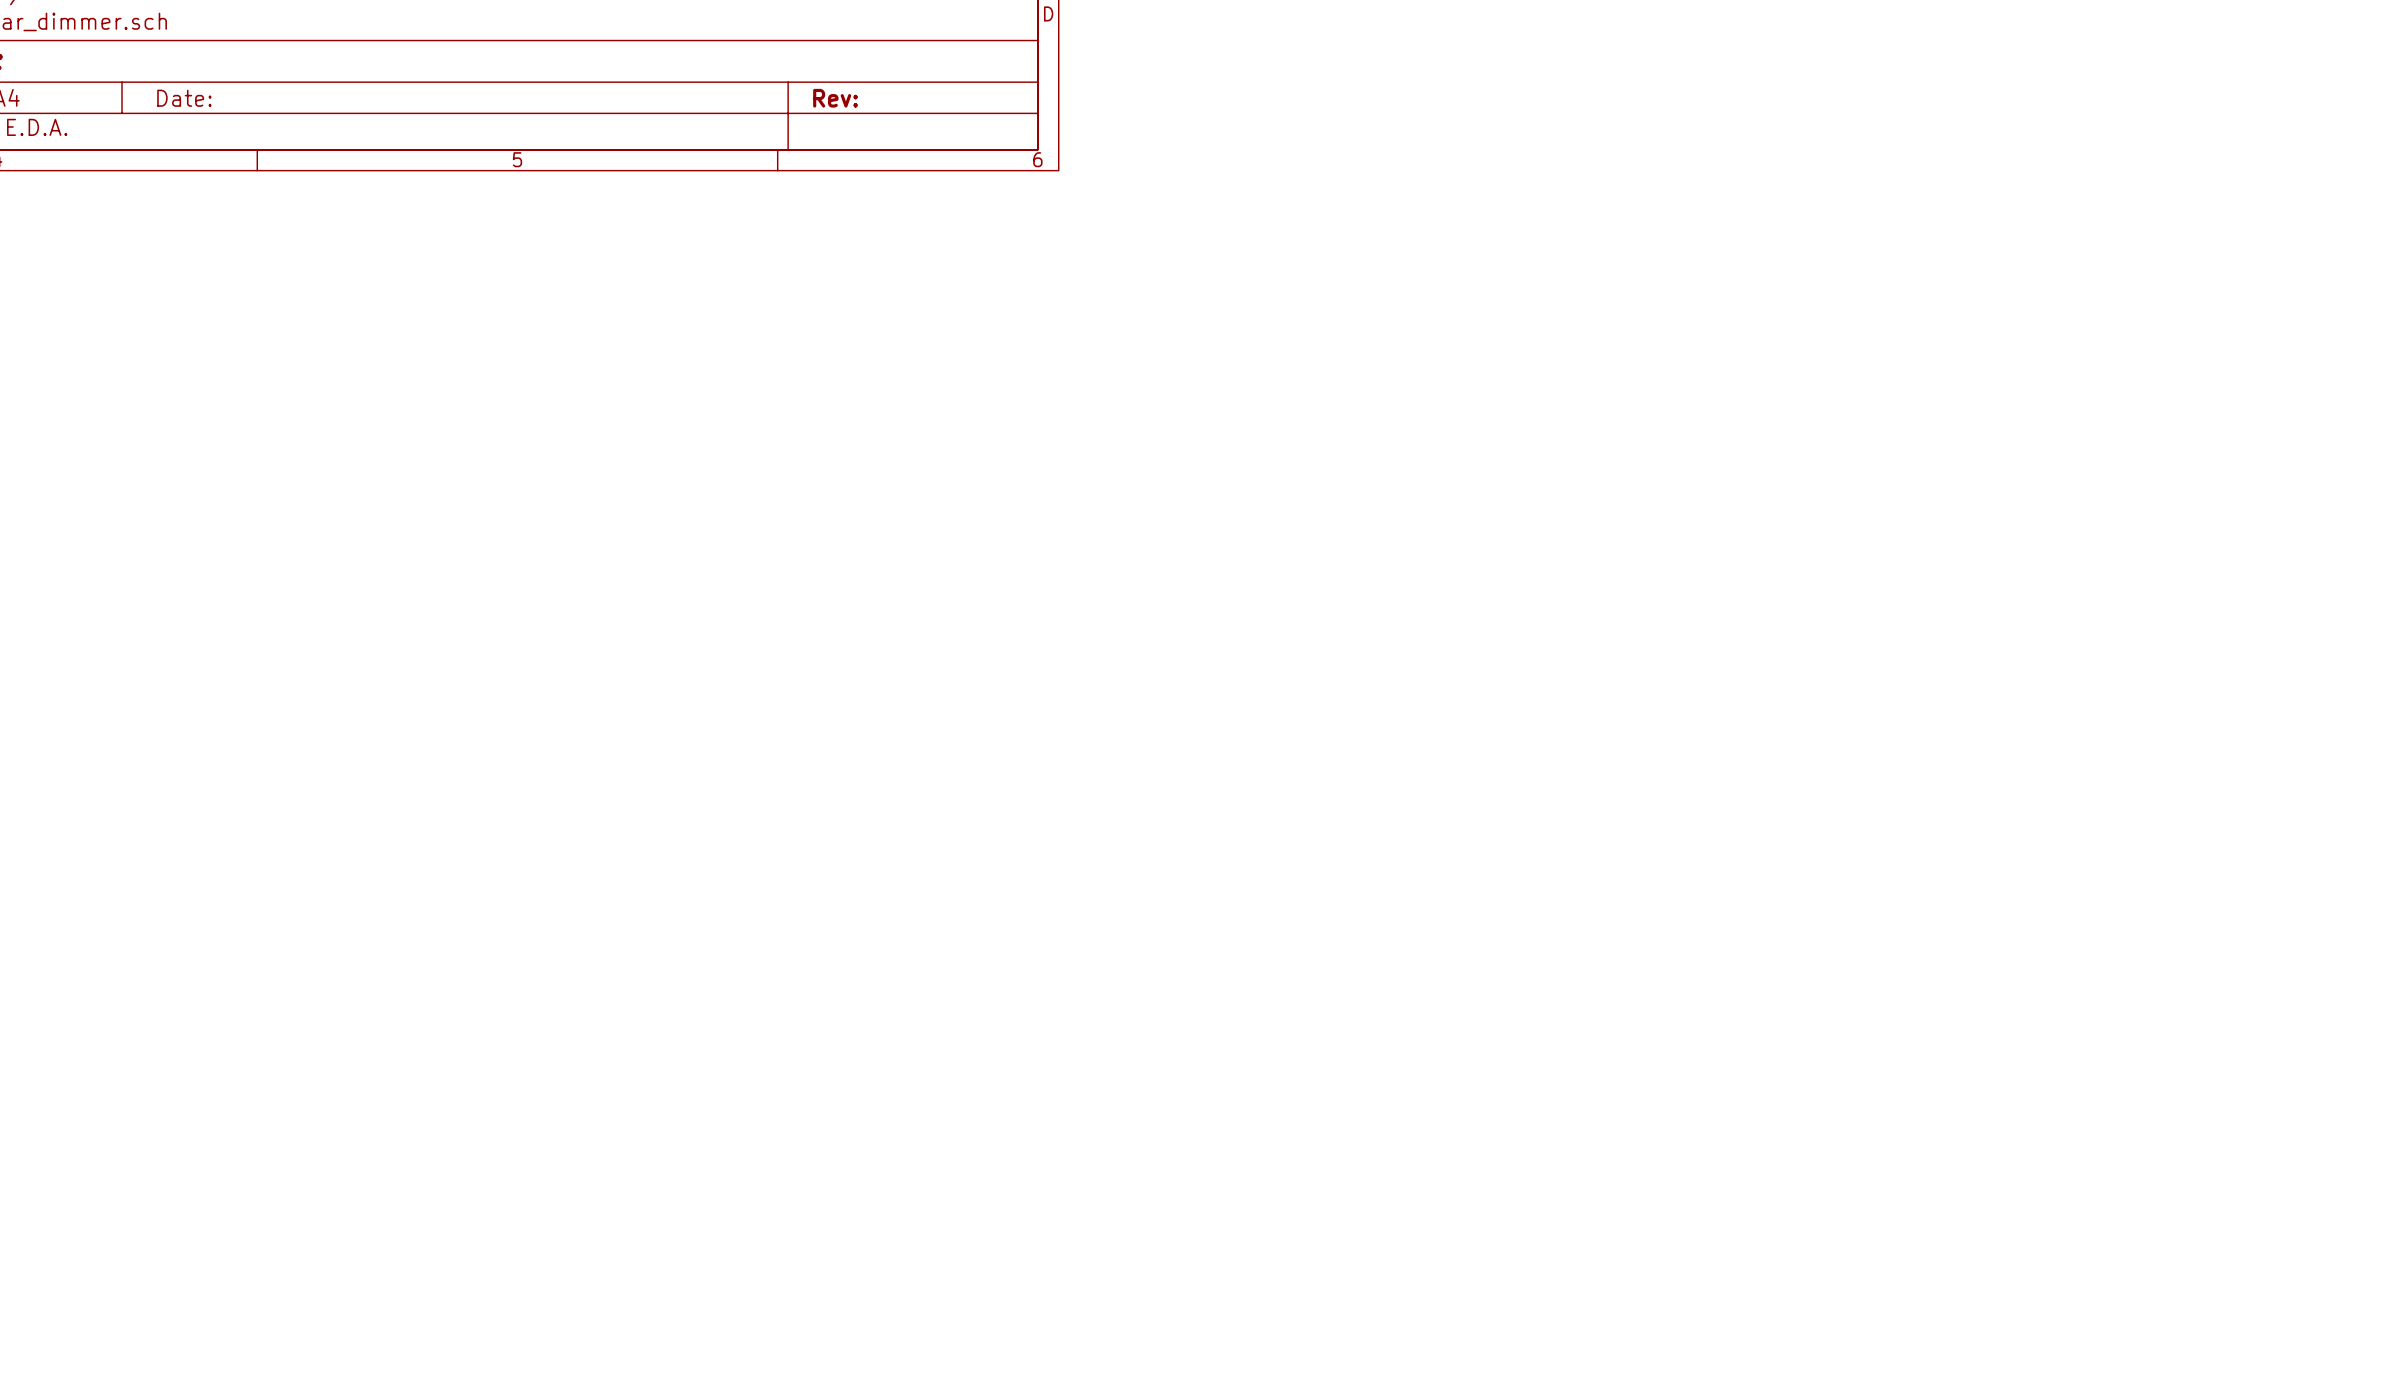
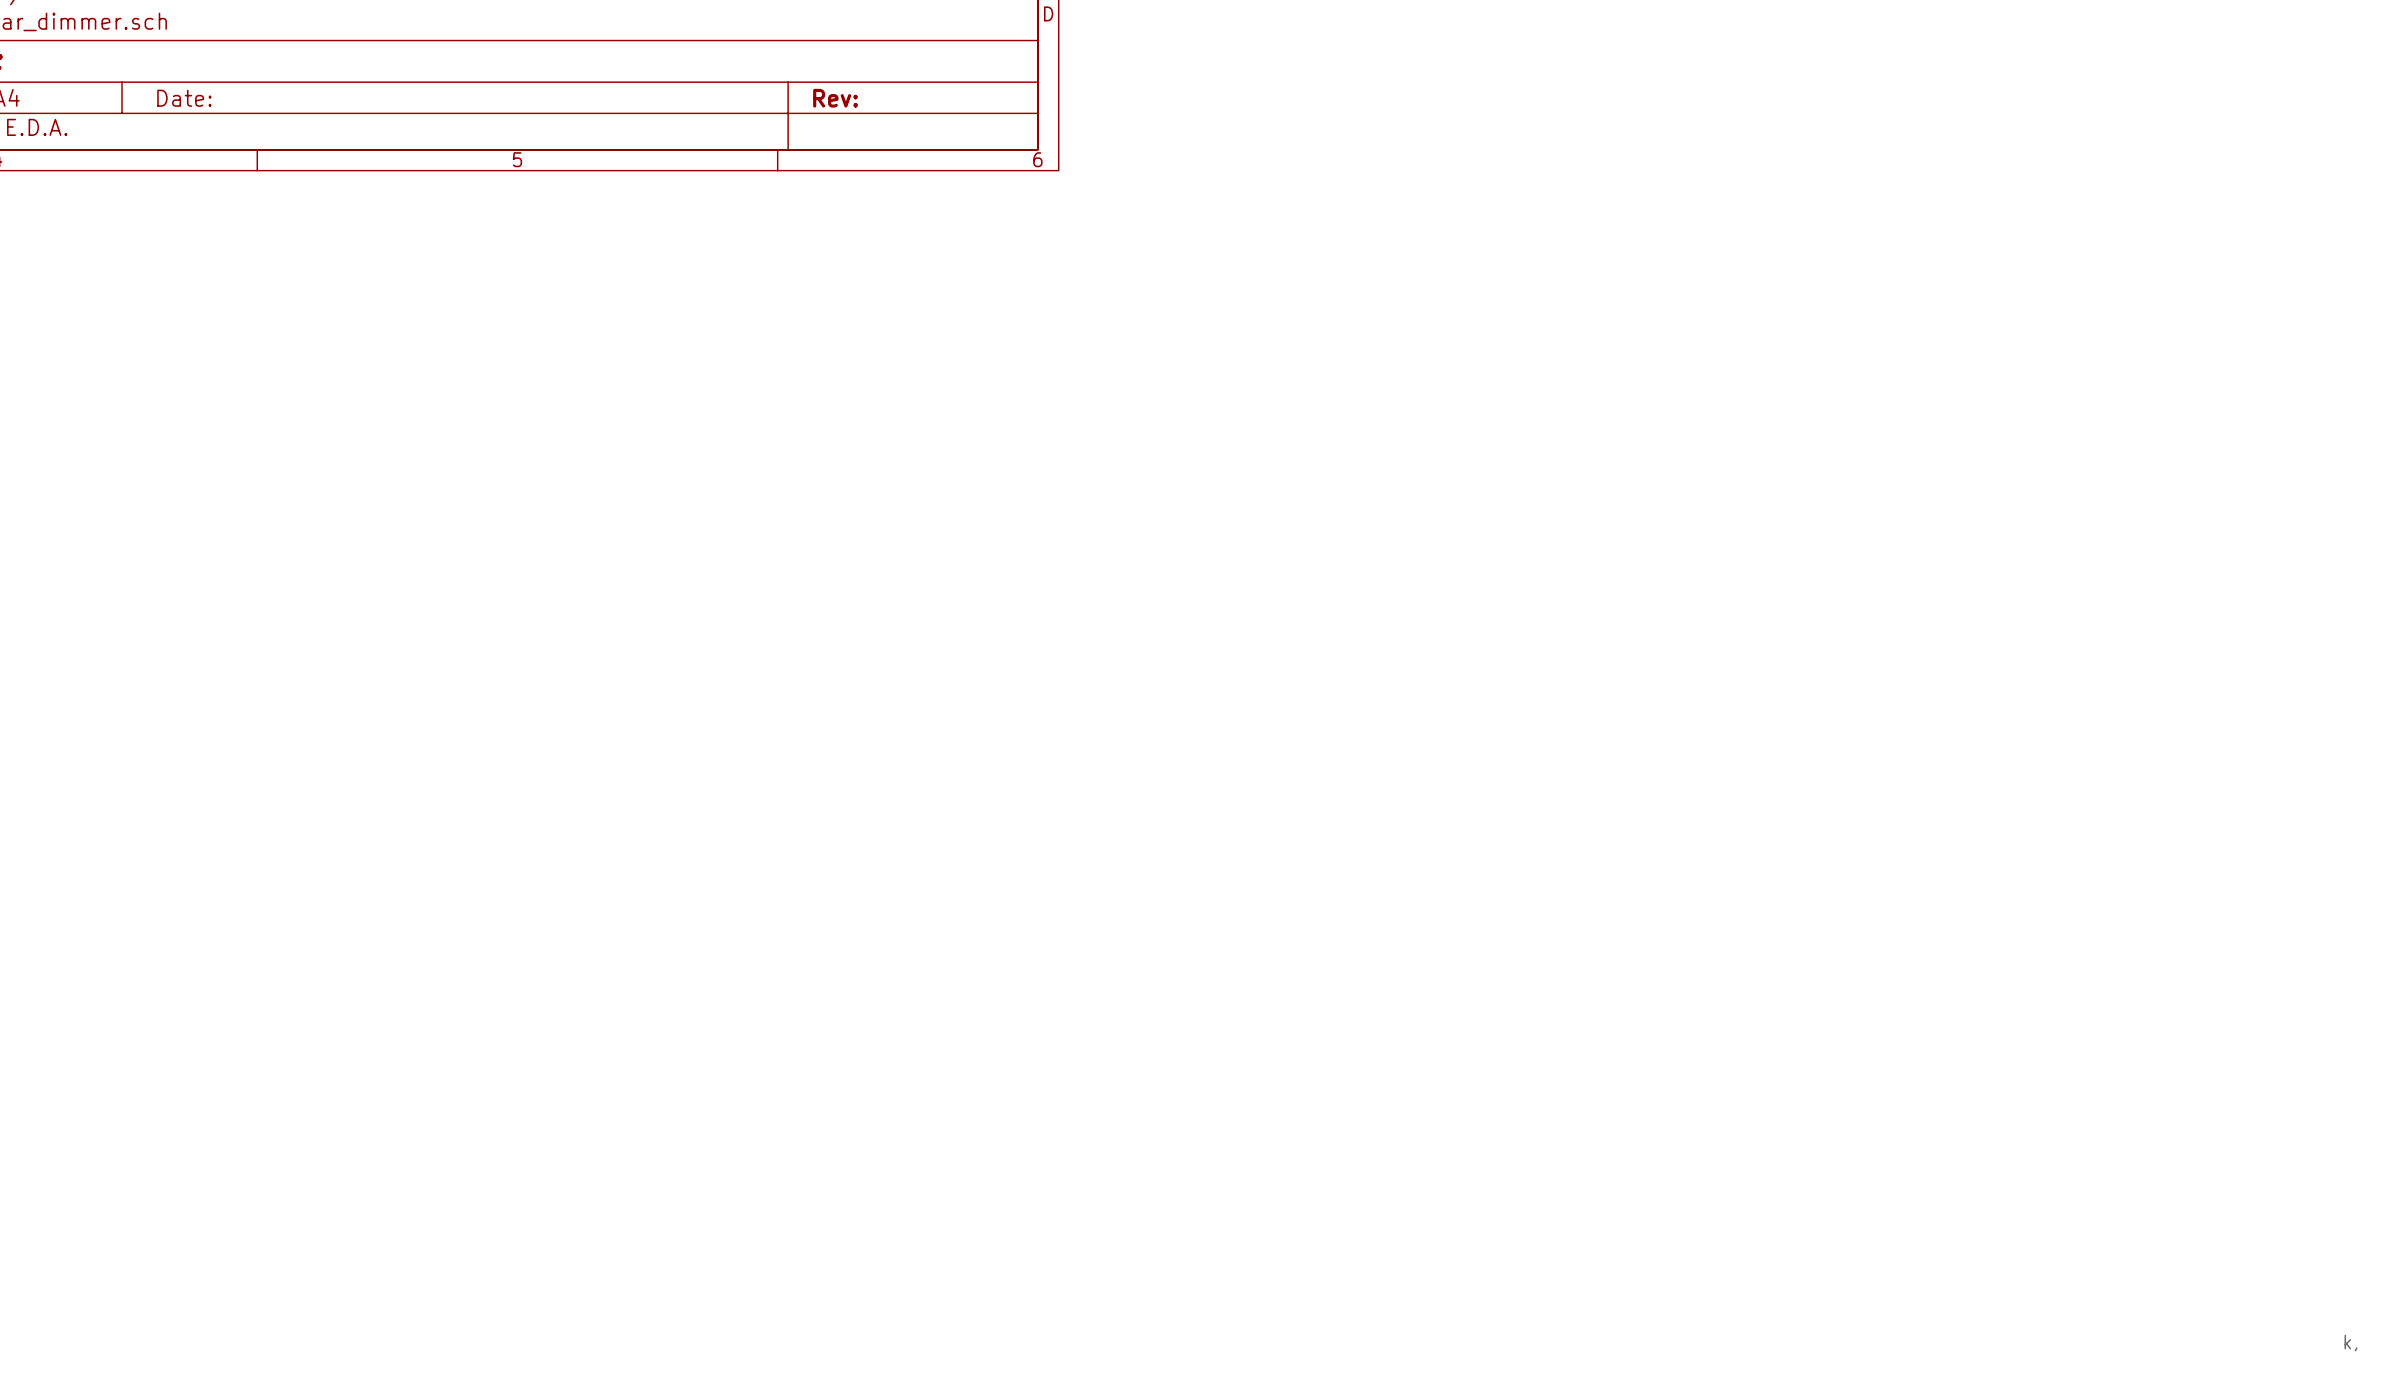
label: none -> k, (2350, 1342)

